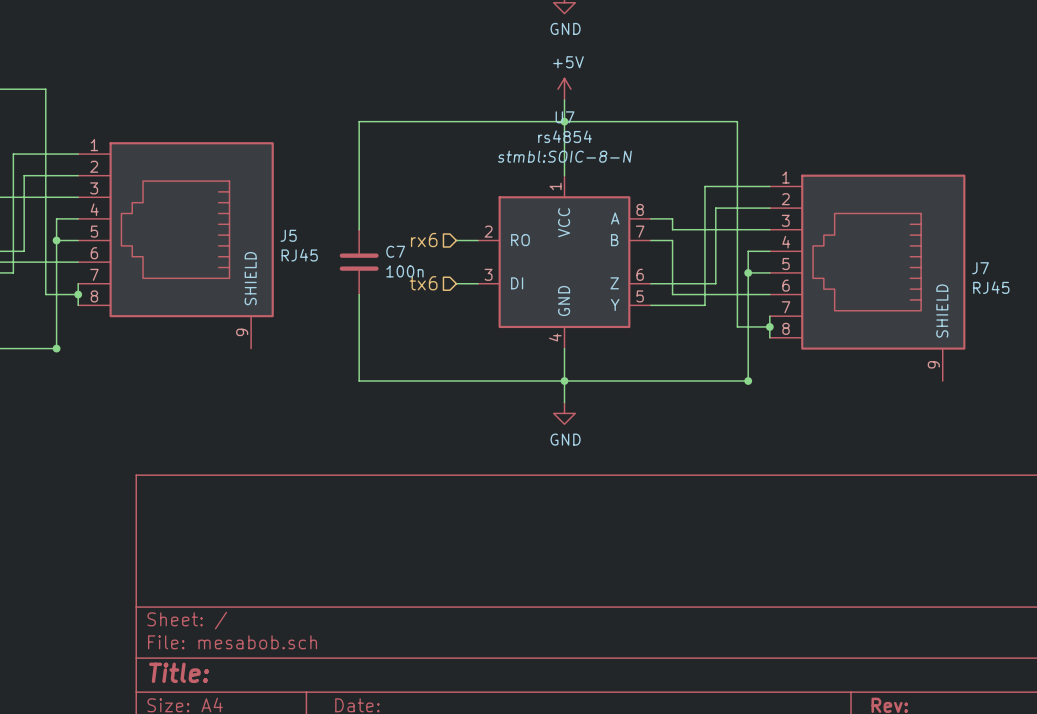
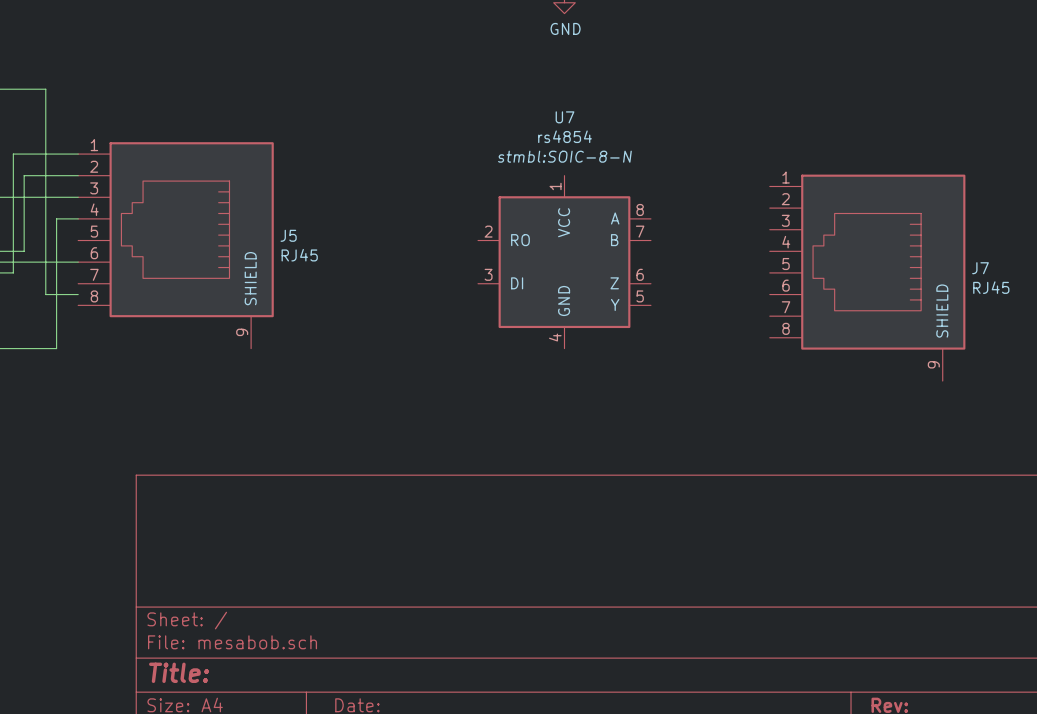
power symbol: +5V (564, 89) -> none
wire: (564, 100) (564, 175) -> none
junction: (564, 121) -> none
wire: (769, 186) (704, 186) (704, 305) (650, 305) -> none
wire: (769, 208) (715, 208) (715, 283) (650, 283) -> none
wire: (650, 218) (672, 218) (672, 229) (769, 229) -> none
wire: (359, 229) (359, 121) (737, 121) (737, 326) (769, 326) -> none
wire: (56, 240) (78, 240) -> none
junction: (56, 240) -> none
hierarchical label: rx6 (424, 240) -> none
wire: (456, 240) (478, 240) -> none
wire: (650, 240) (672, 240) (672, 294) (769, 294) -> none
wire: (769, 251) (748, 251) (748, 381) (359, 381) (359, 294) -> none
C7: 100n (359, 262) -> none
wire: (748, 272) (769, 272) -> none
junction: (748, 272) -> none
wire: (78, 283) (78, 305) -> none
hierarchical label: tx6 (423, 283) -> none
wire: (456, 283) (478, 283) -> none
junction: (78, 294) -> none
wire: (769, 316) (769, 337) -> none
junction: (769, 326) -> none
junction: (56, 348) -> none
wire: (564, 348) (564, 402) -> none
junction: (564, 381) -> none
junction: (748, 381) -> none
power symbol: GND (564, 413) -> none

